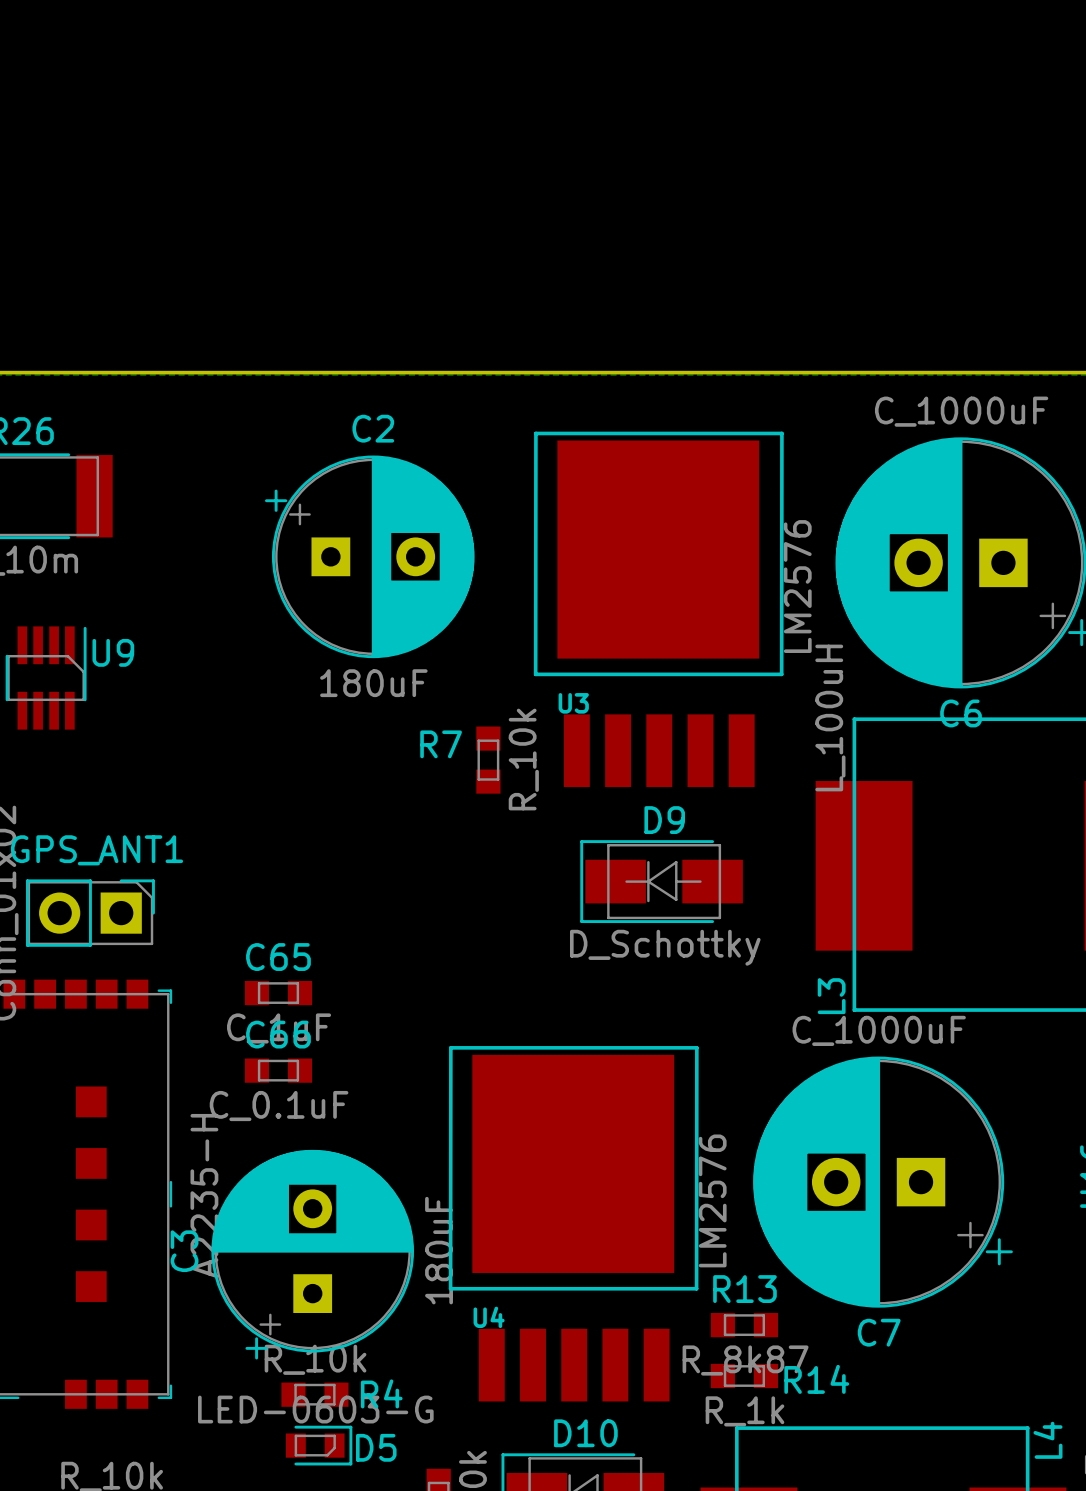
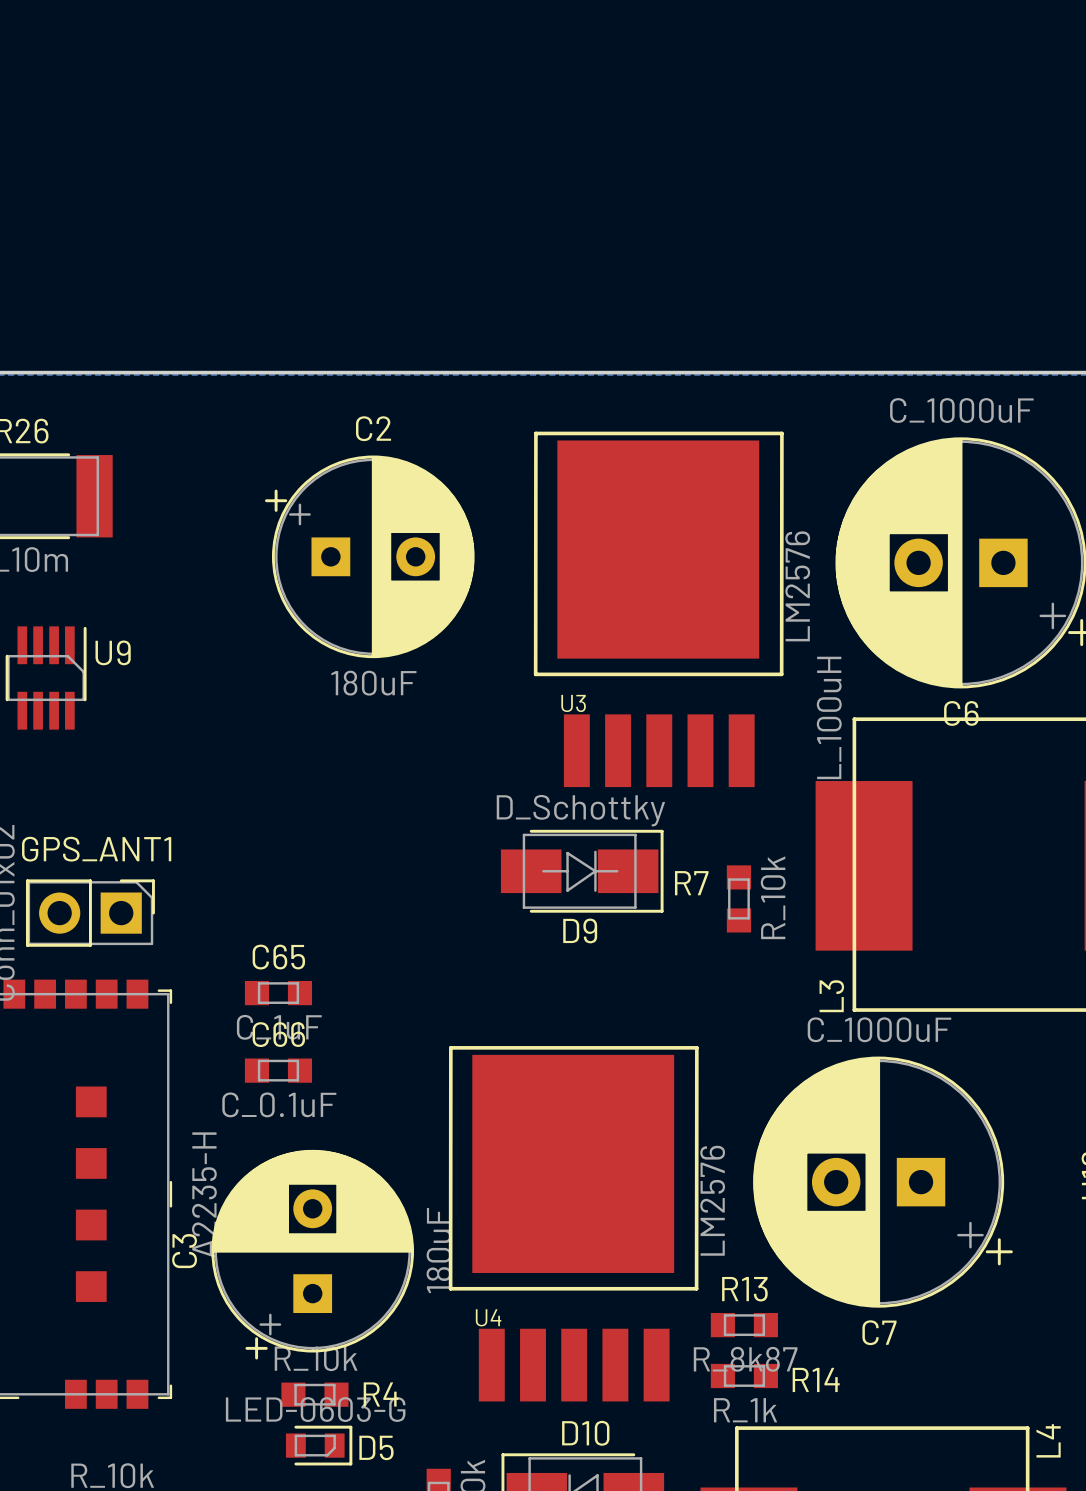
R7 position: (488, 760) -> (738, 898)
D9 rotation: 0° (661, 881) -> 180° (582, 871)

